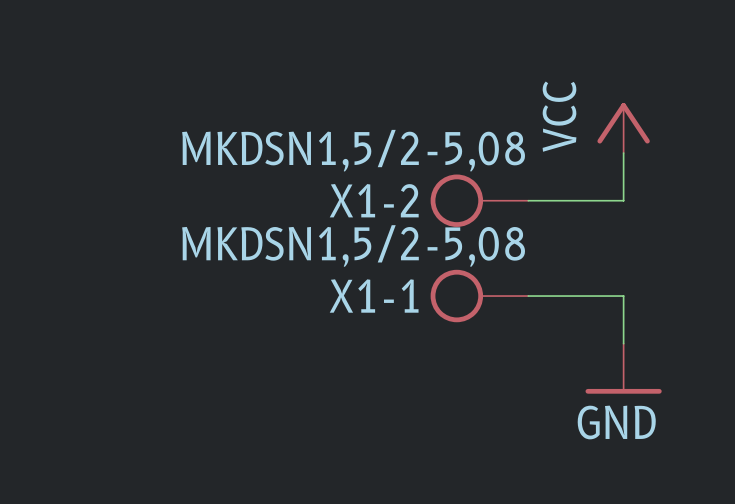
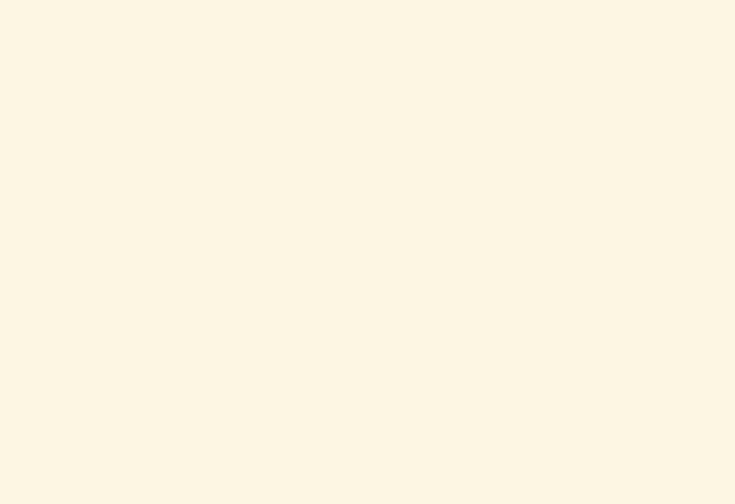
power symbol: VCC (623, 128) -> none
wire: (623, 153) (623, 200) (528, 200) -> none
X1-2: MKDSN1,5/2-5,08 (479, 200) -> none
X1-1: MKDSN1,5/2-5,08 (479, 296) -> none
wire: (528, 296) (623, 296) (623, 343) -> none
power symbol: GND (623, 368) -> none

